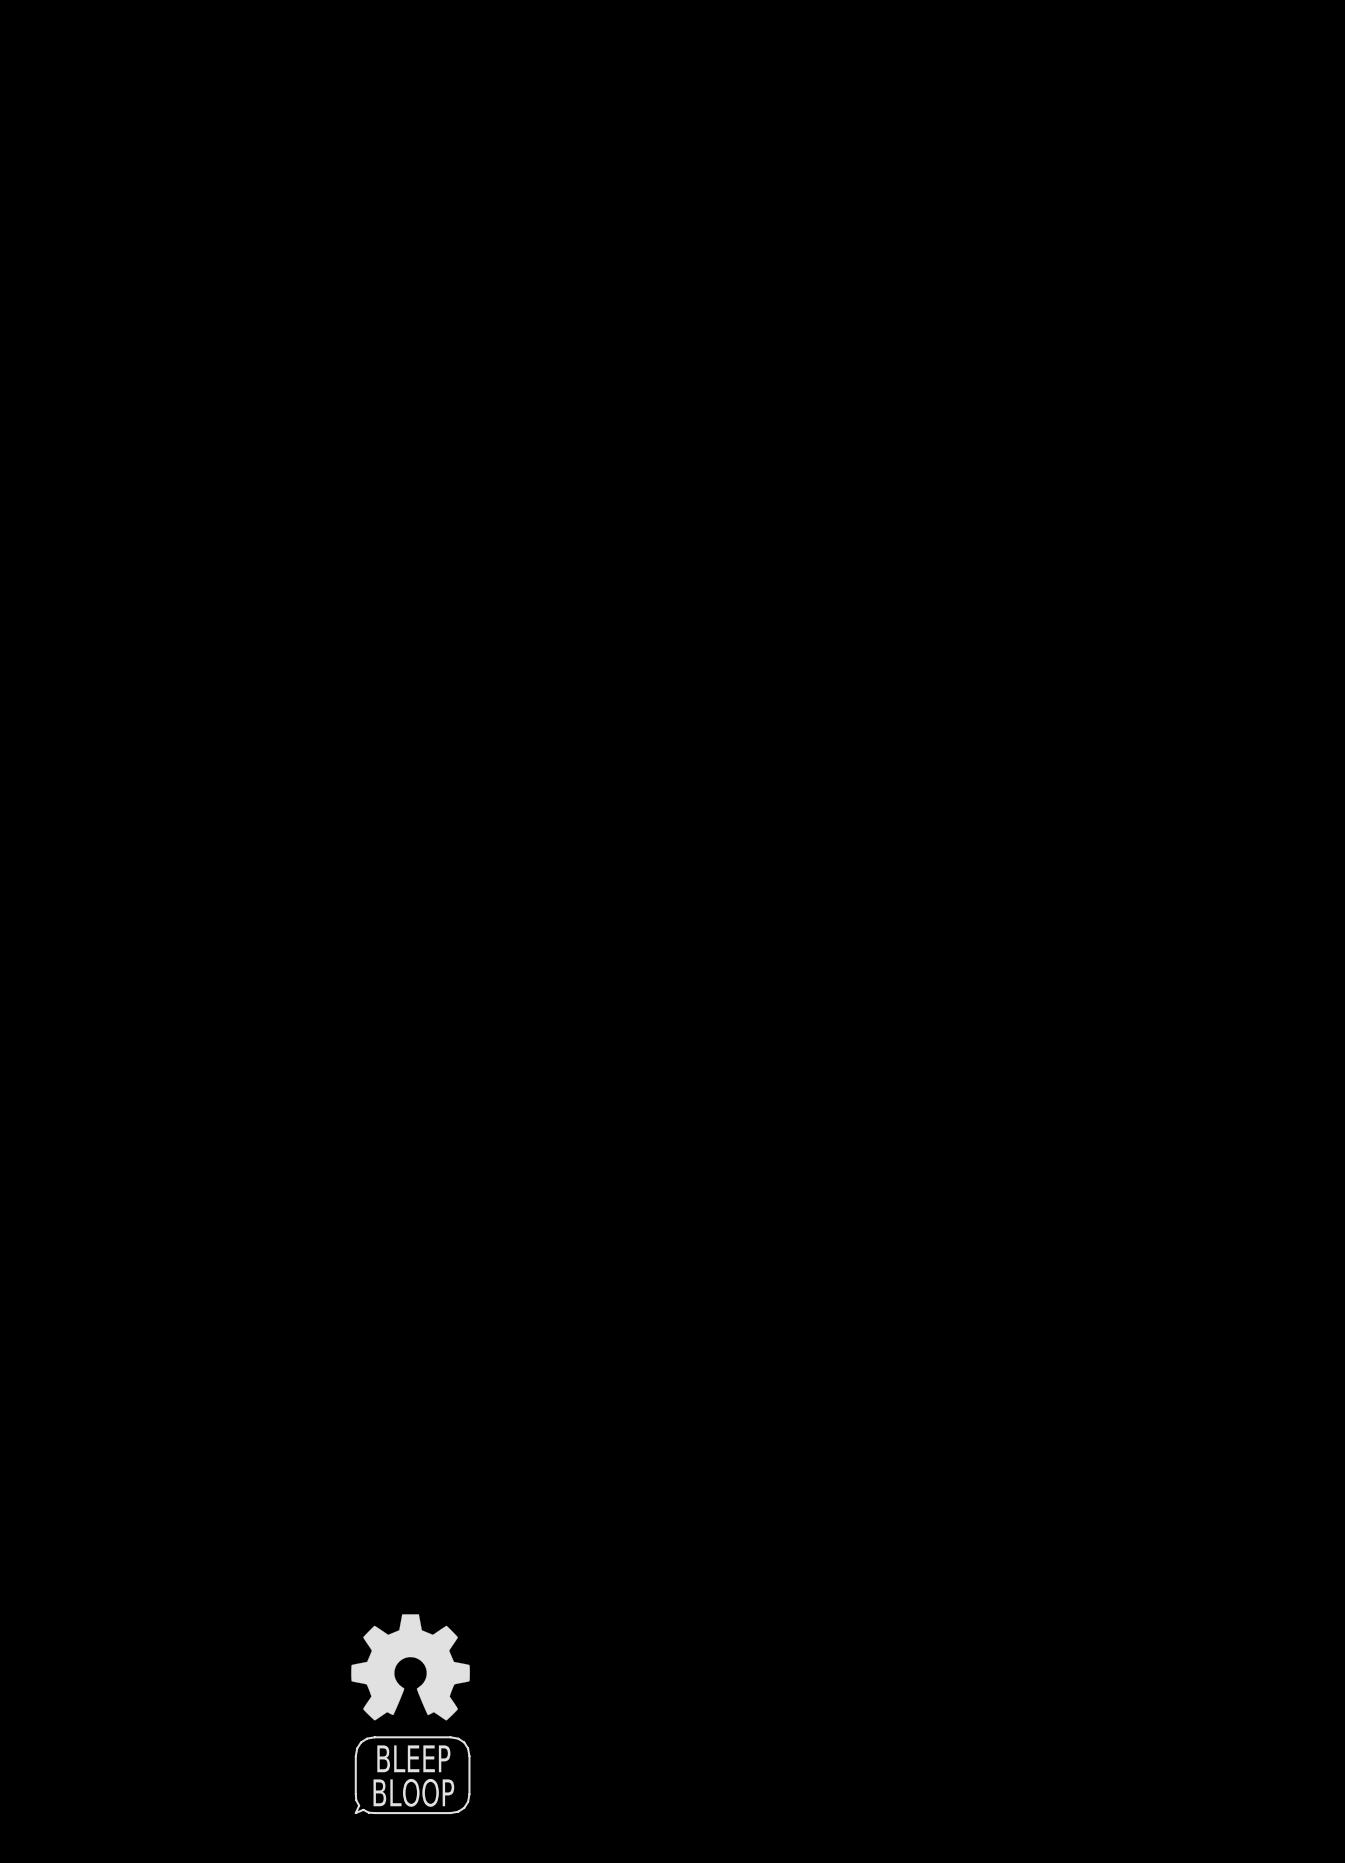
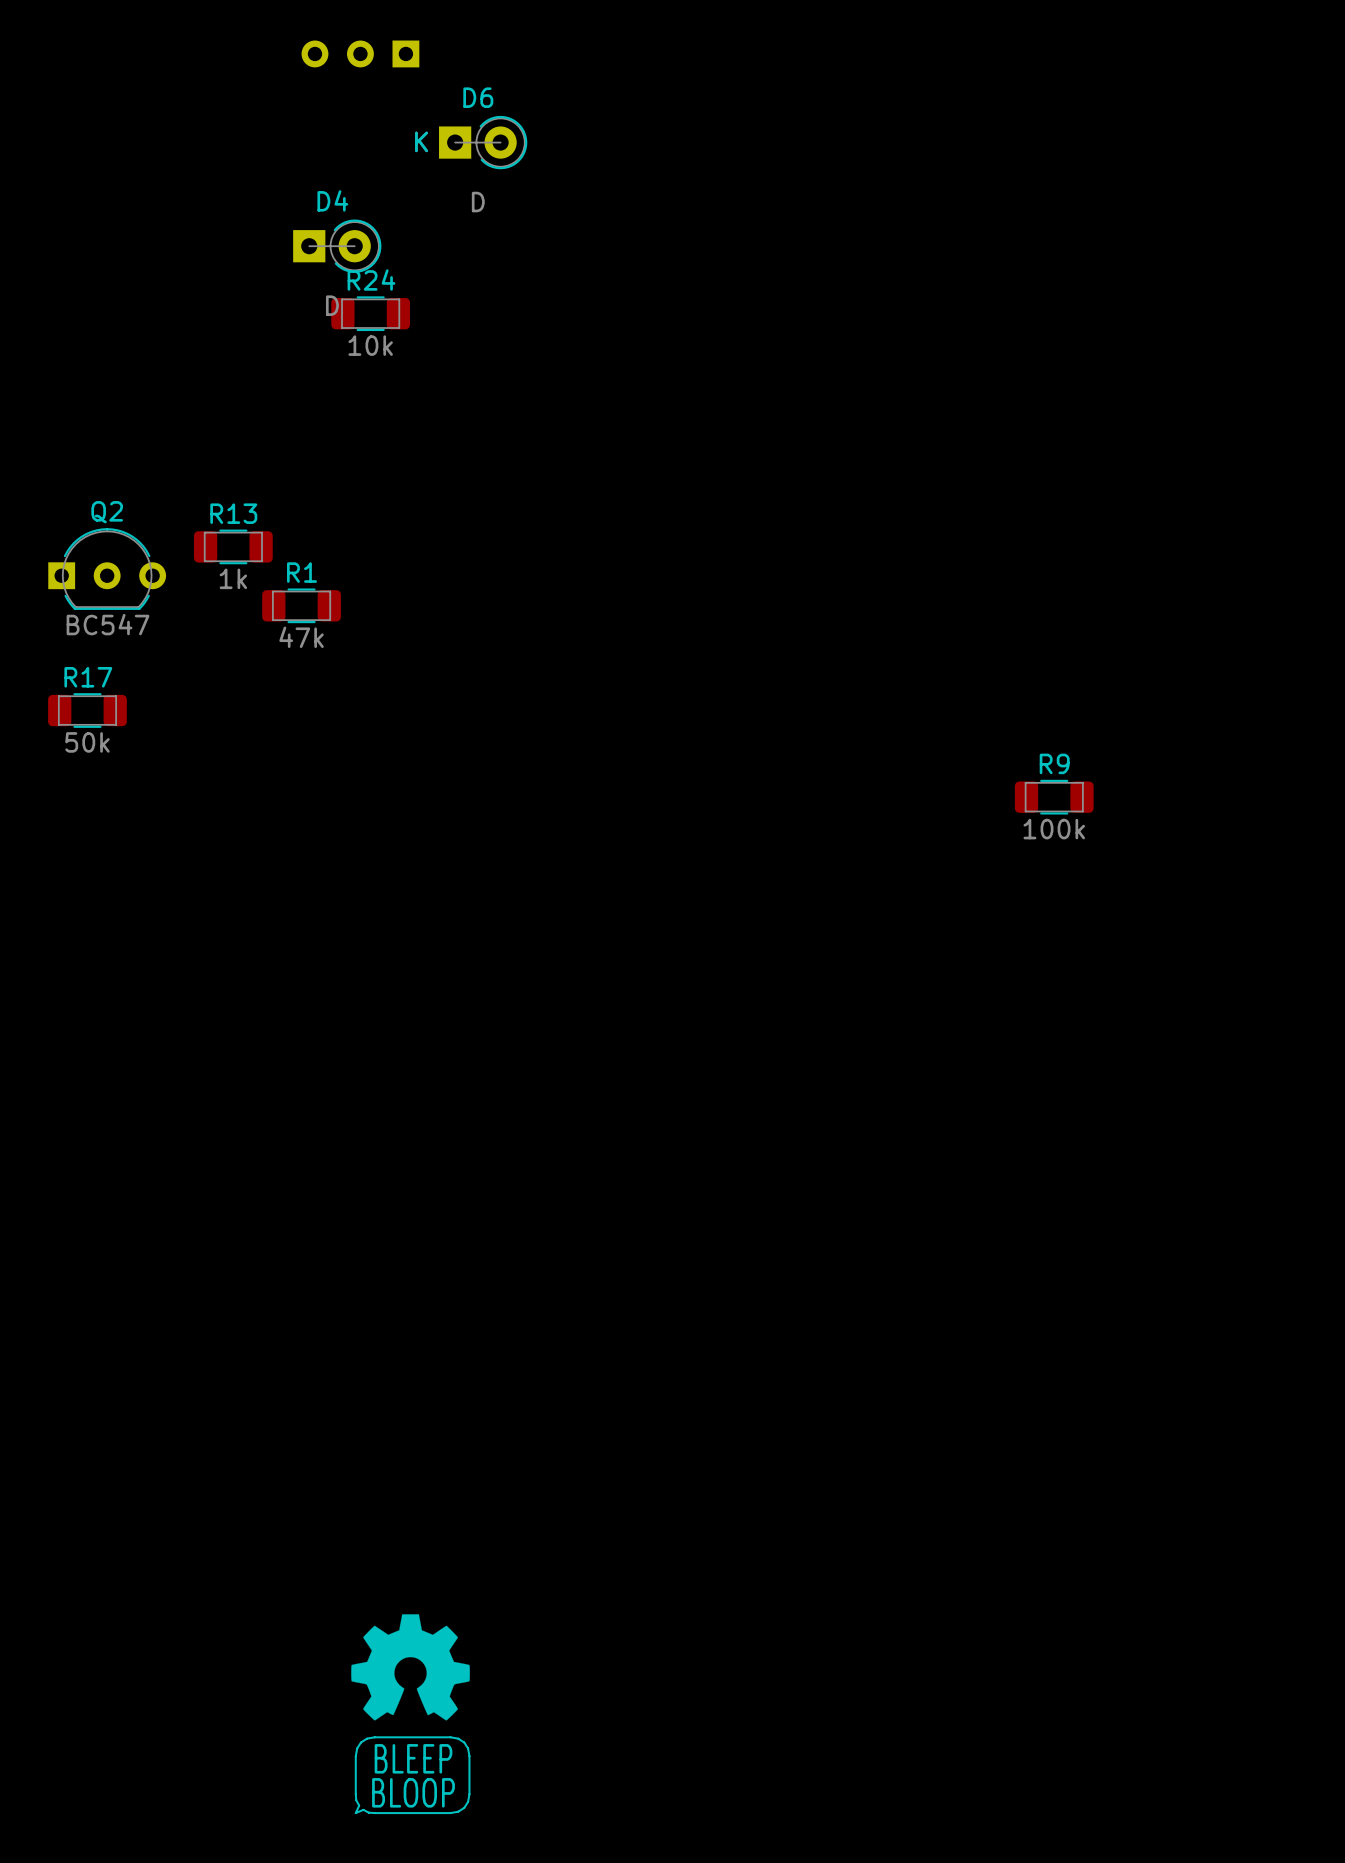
part: none -> (360, 53)
D6: none -> D (483, 142)
D4: none -> D (337, 246)
R24: none -> 10k (370, 313)
R13: none -> 1k (233, 546)
Q2: none -> BC547 (107, 569)
R1: none -> 47k (301, 605)
R17: none -> 50k (87, 710)
R9: none -> 100k (1054, 797)

